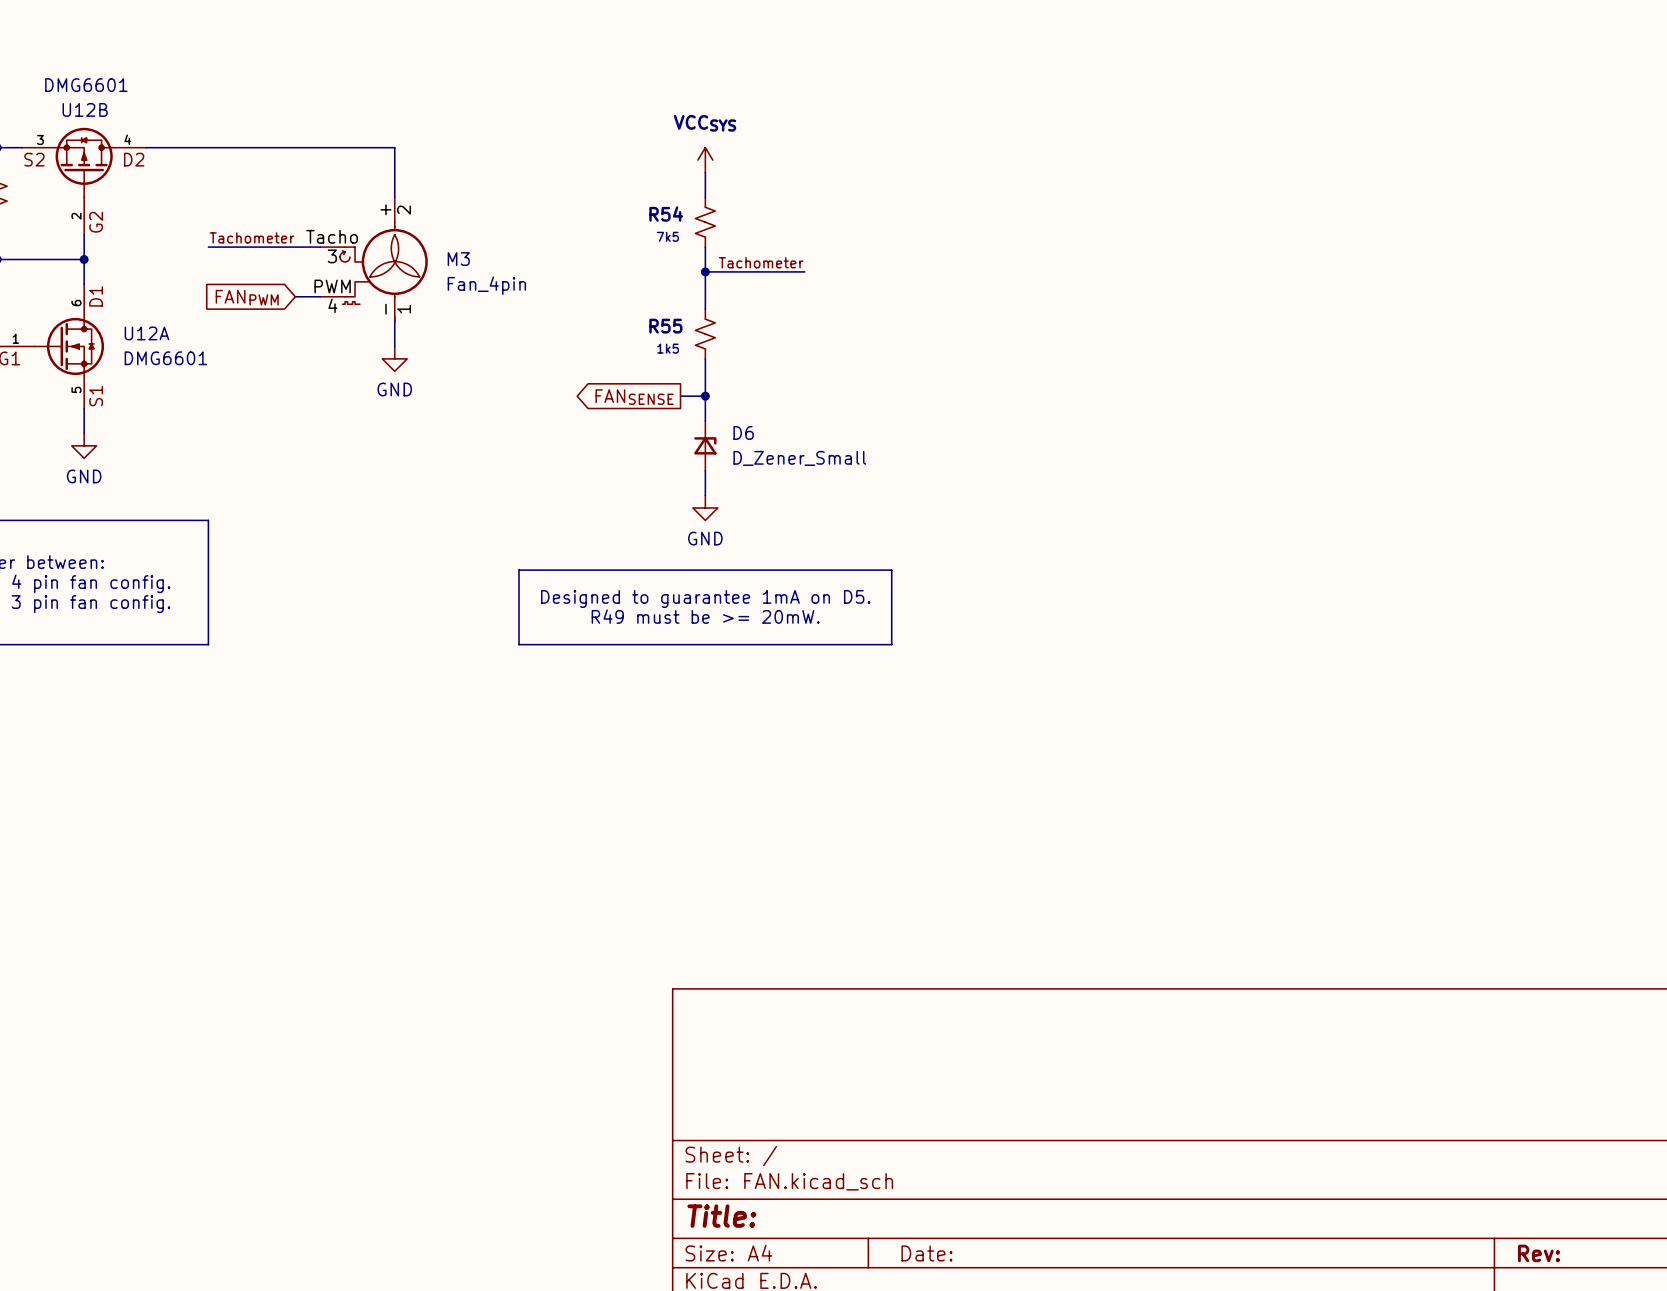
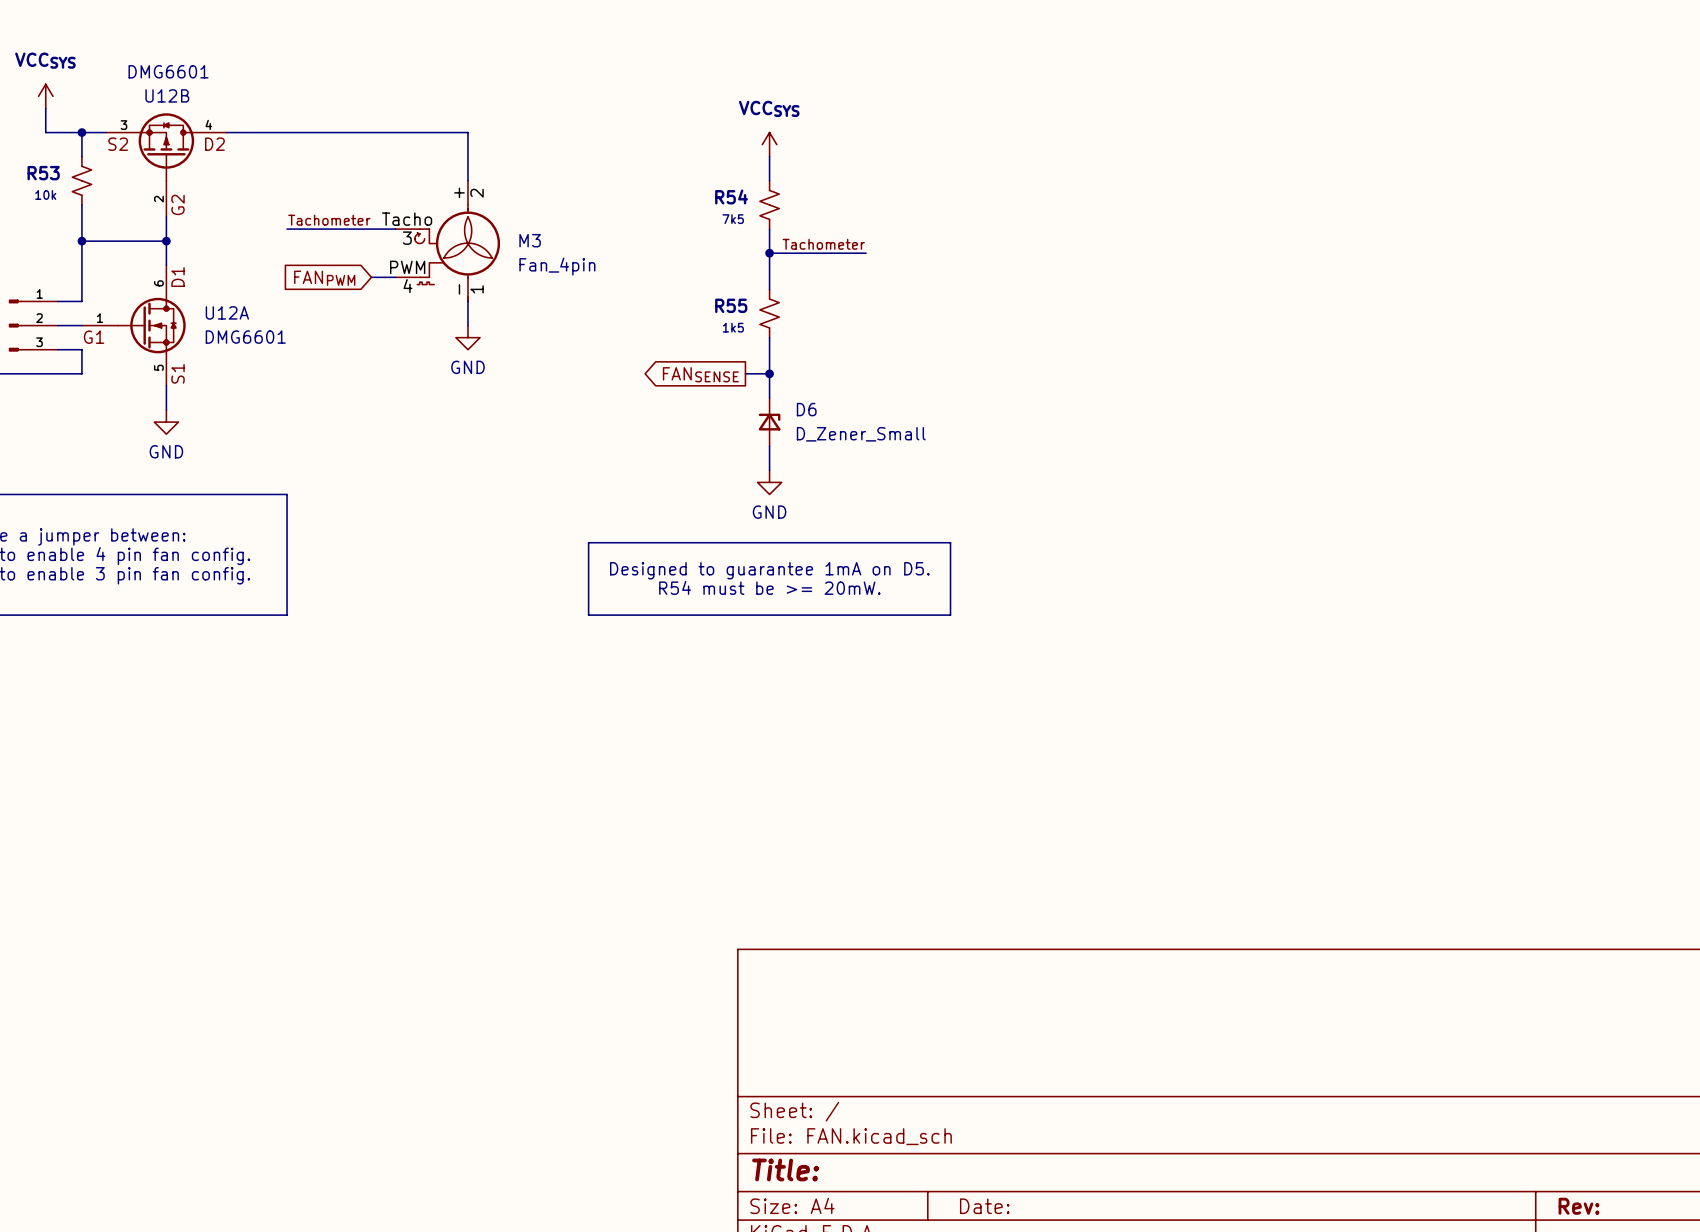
text: R49 must be >= 20mW. (705, 616) -> R54 must be >= 20mW. (769, 587)

